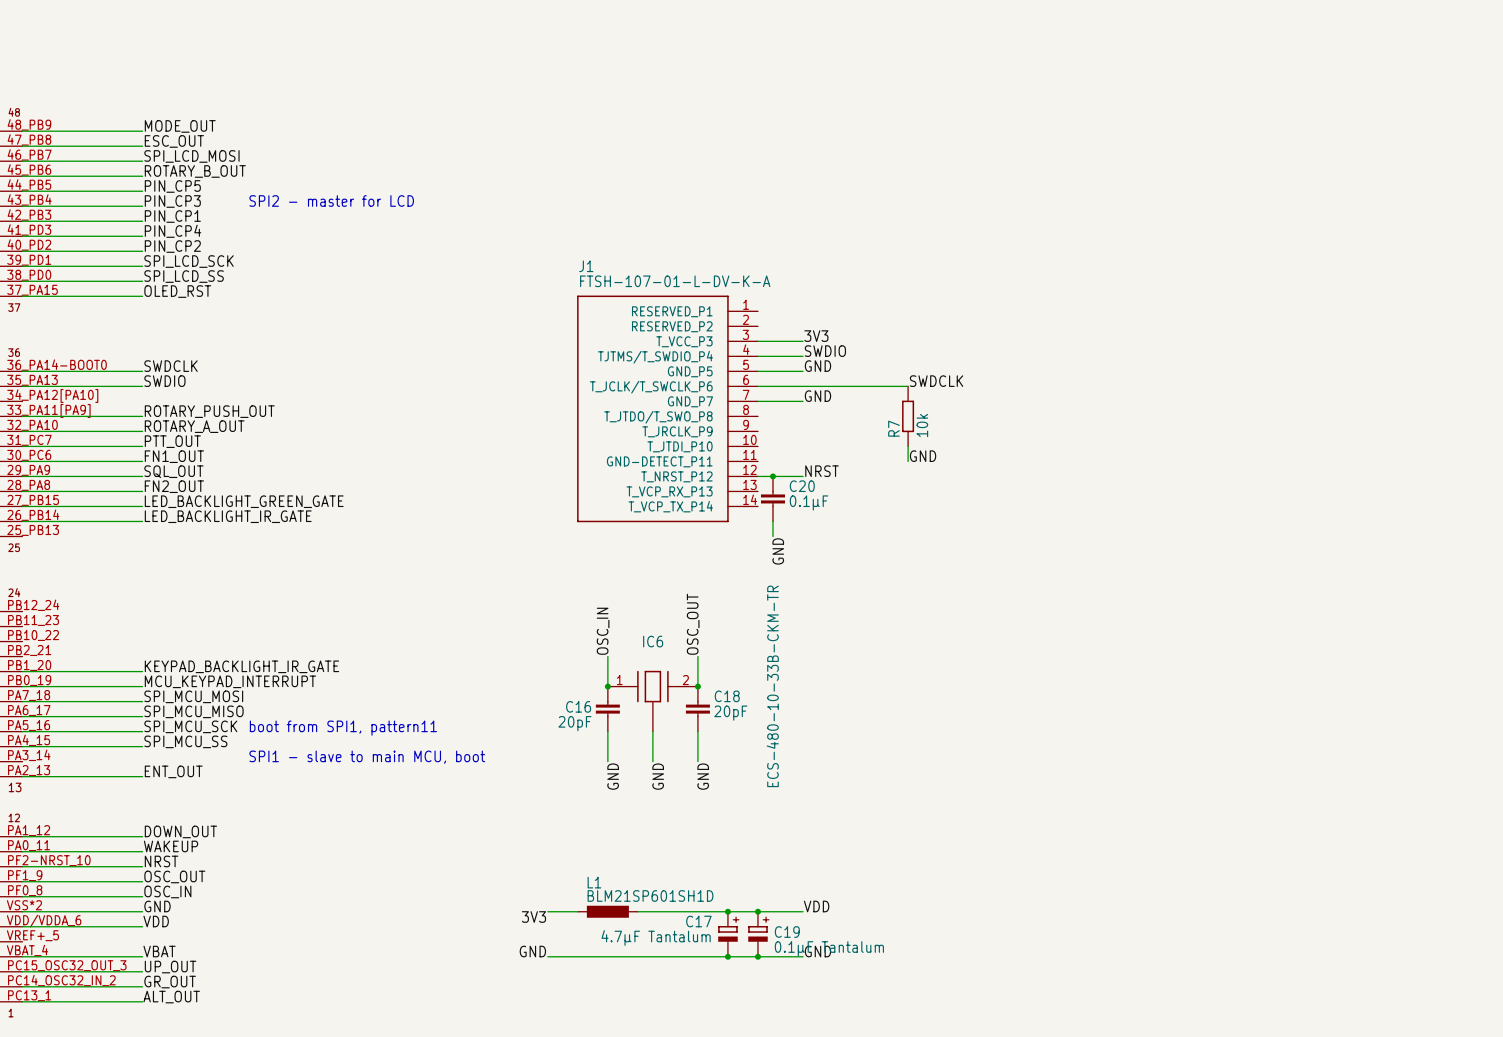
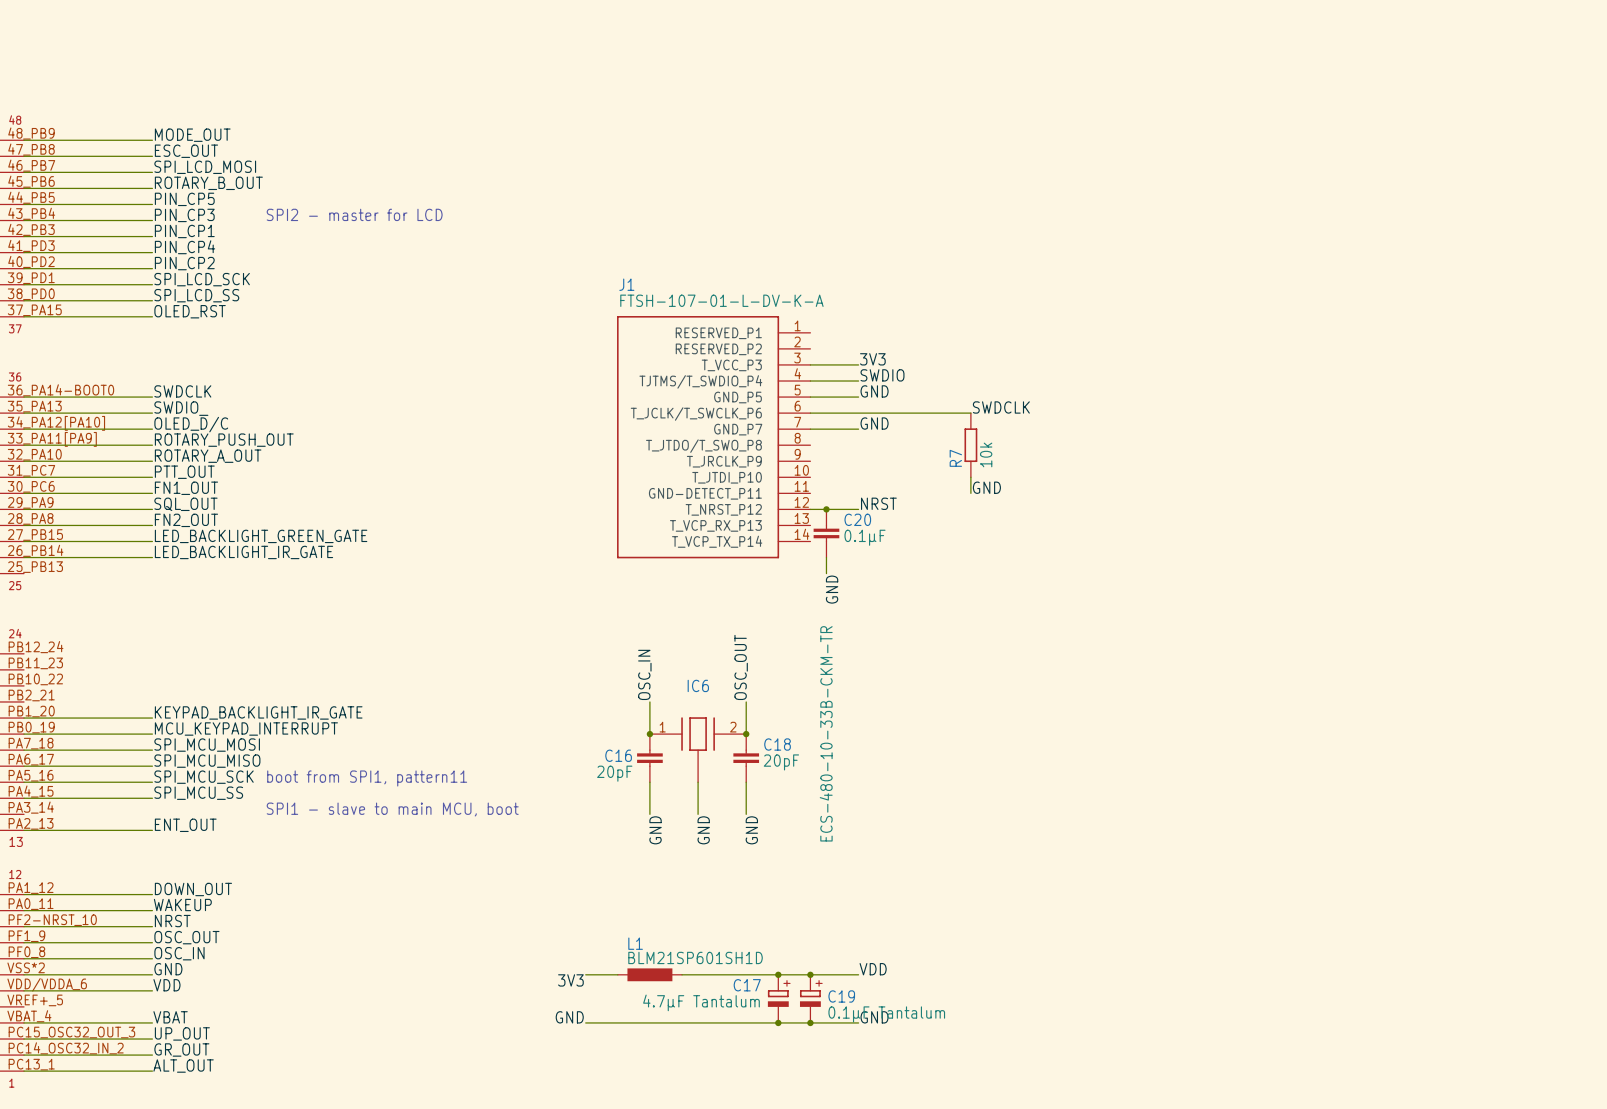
label: none -> OLED_~{D}/C (191, 423)
wire: none -> (24, 429) (152, 429)

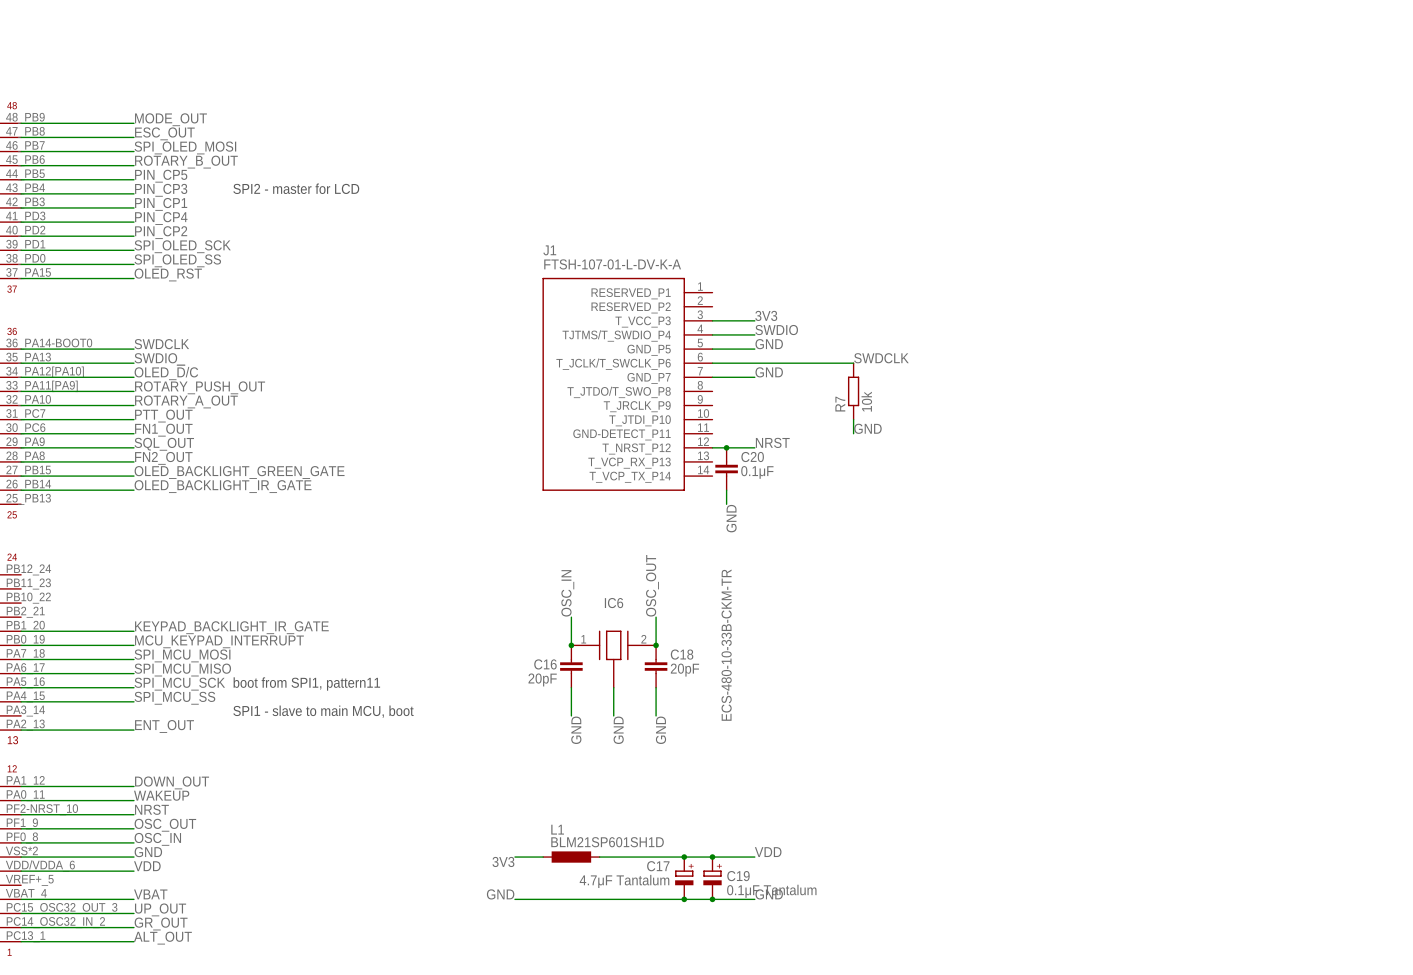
label: SPI_LCD_MOSI (205, 167) -> SPI_OLED_MOSI (185, 147)
label: SPI_LCD_SCK (202, 279) -> SPI_OLED_SCK (182, 246)
label: SPI_LCD_SS (196, 295) -> SPI_OLED_SS (177, 260)
label: LED_BACKLIGHT_GREEN_GATE (261, 536) -> OLED_BACKLIGHT_GREEN_GATE (239, 472)
label: LED_BACKLIGHT_IR_GATE (243, 552) -> OLED_BACKLIGHT_IR_GATE (223, 486)

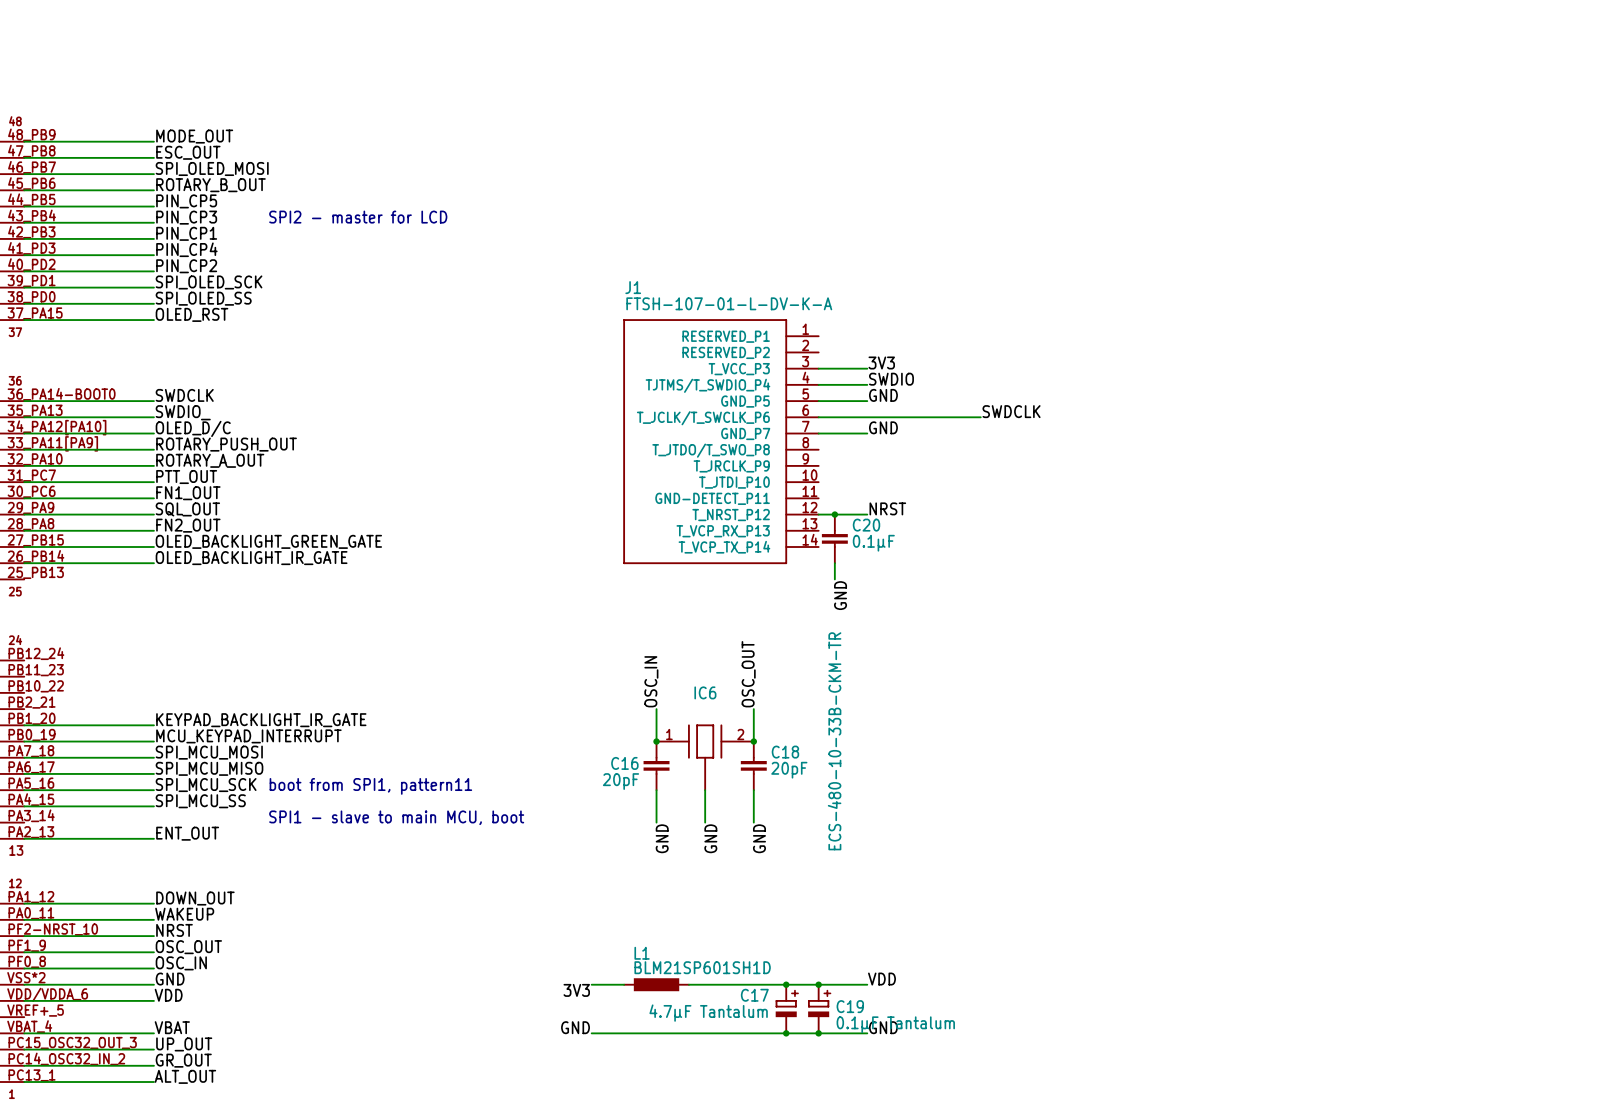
R7: 10k (853, 391) -> none
wire: (853, 419) (853, 433) -> none
label: GND (867, 428) -> none

